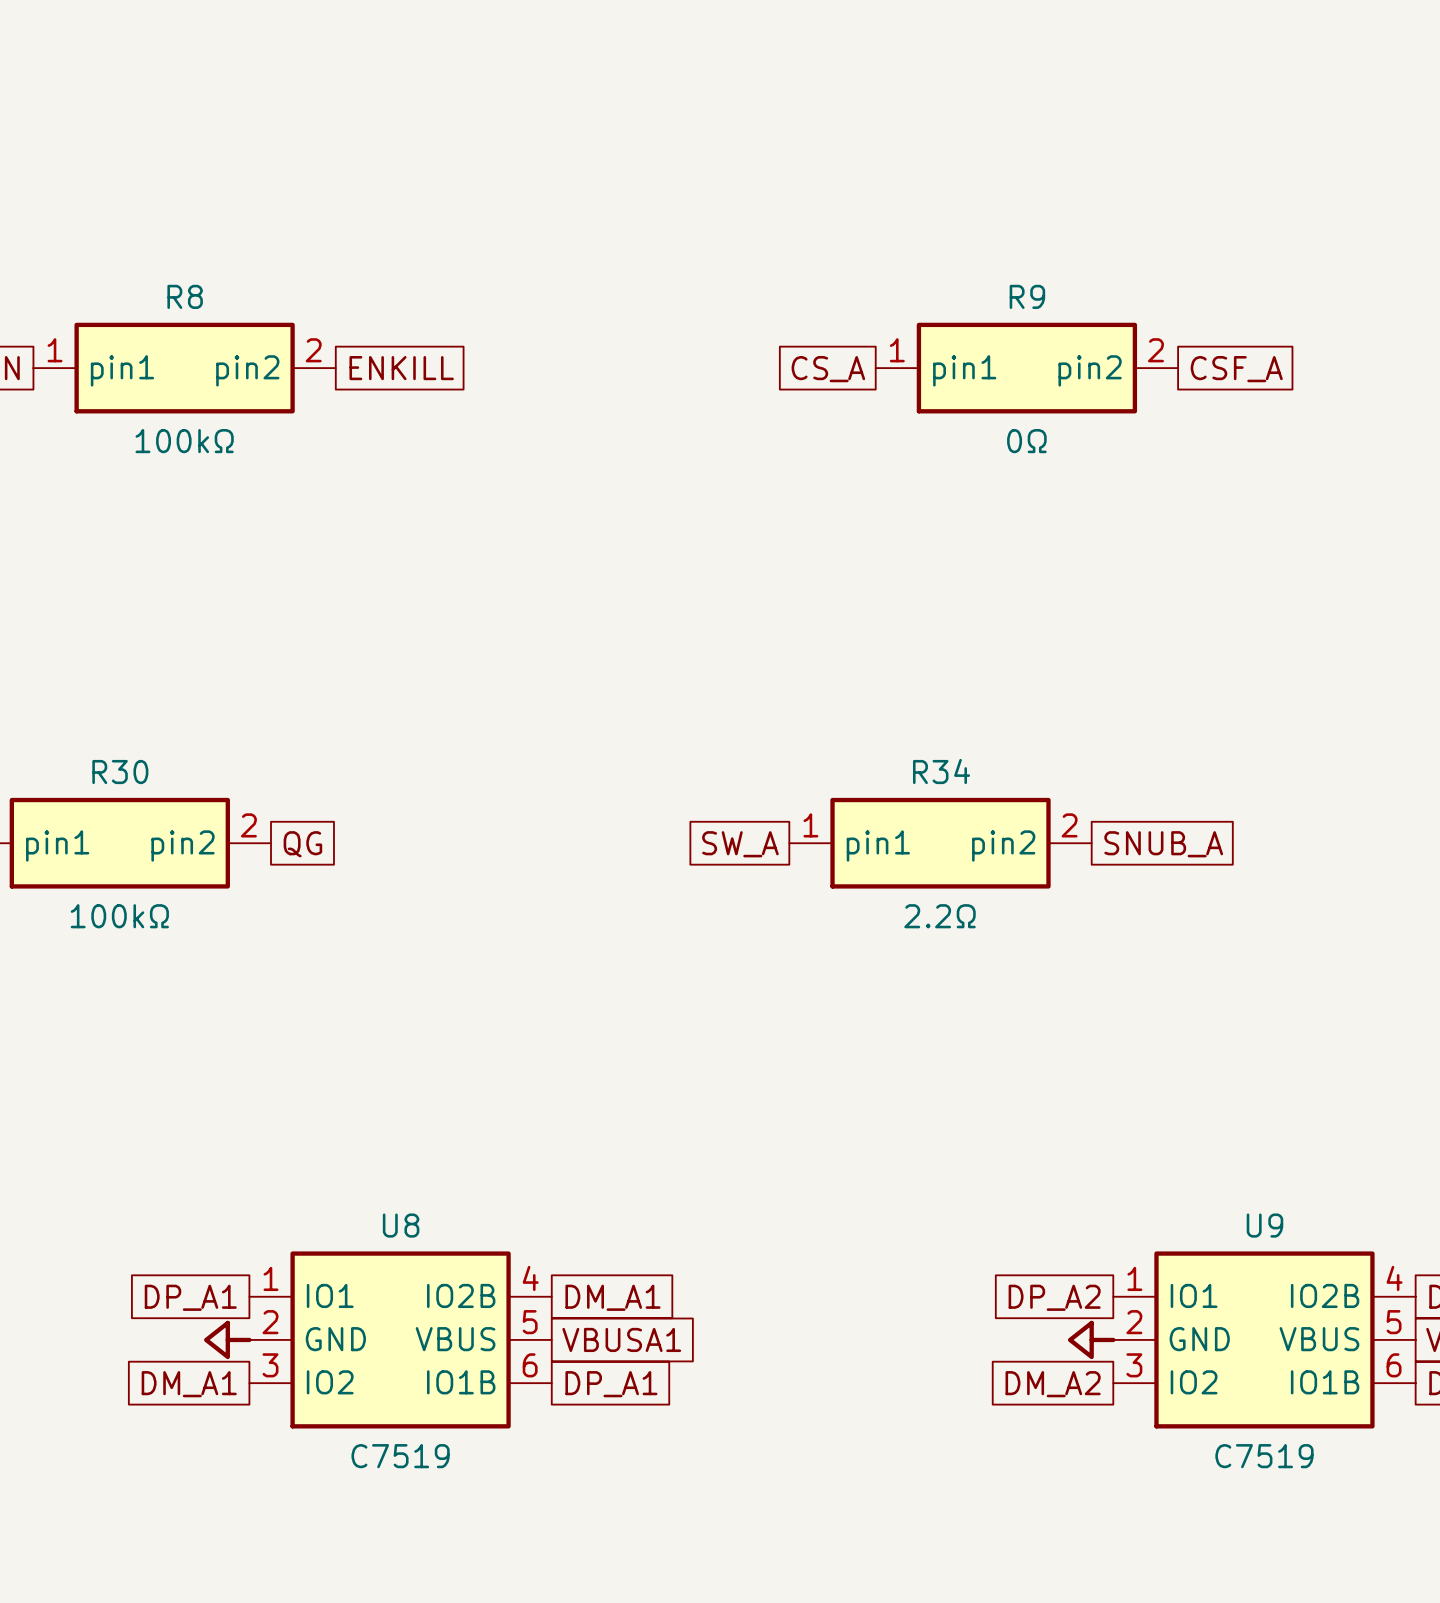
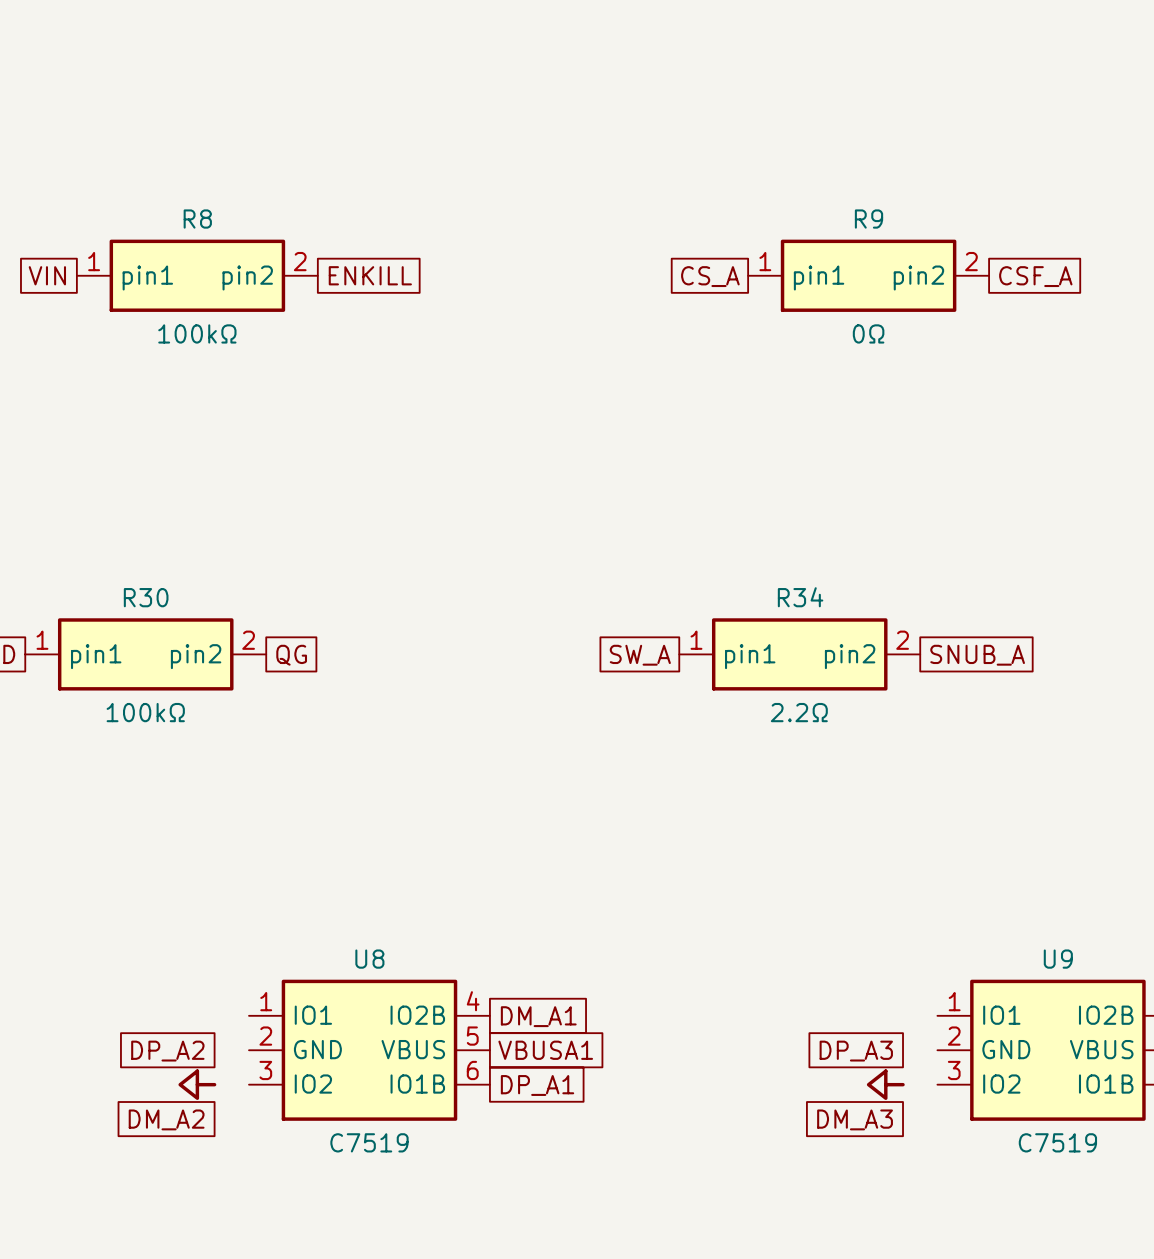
global label: DP_A1 (190, 1297) -> DP_A2 (167, 1051)
global label: DP_A2 (1054, 1297) -> DP_A3 (856, 1051)
power symbol position: (227, 1339) -> (197, 1084)
power symbol position: (1091, 1339) -> (885, 1084)
global label: DM_A1 (189, 1384) -> DM_A2 (166, 1119)
global label: DM_A2 (1053, 1384) -> DM_A3 (855, 1119)

